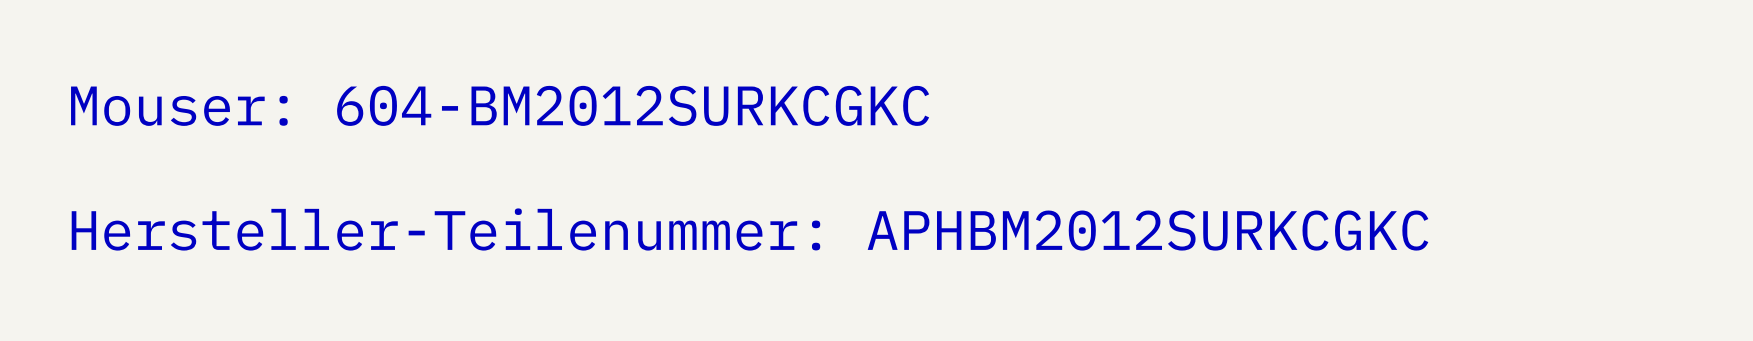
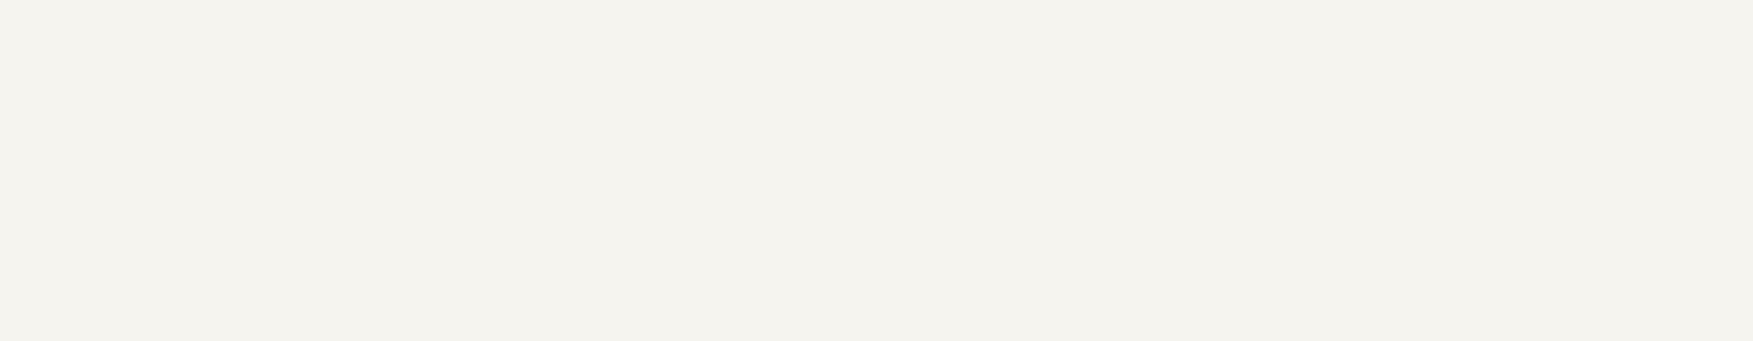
text: Mouser: 604-BM2012SURKCGKC (500, 105) -> none
text: Hersteller-Teilenummer: APHBM2012SURKCGKC (750, 229) -> none

